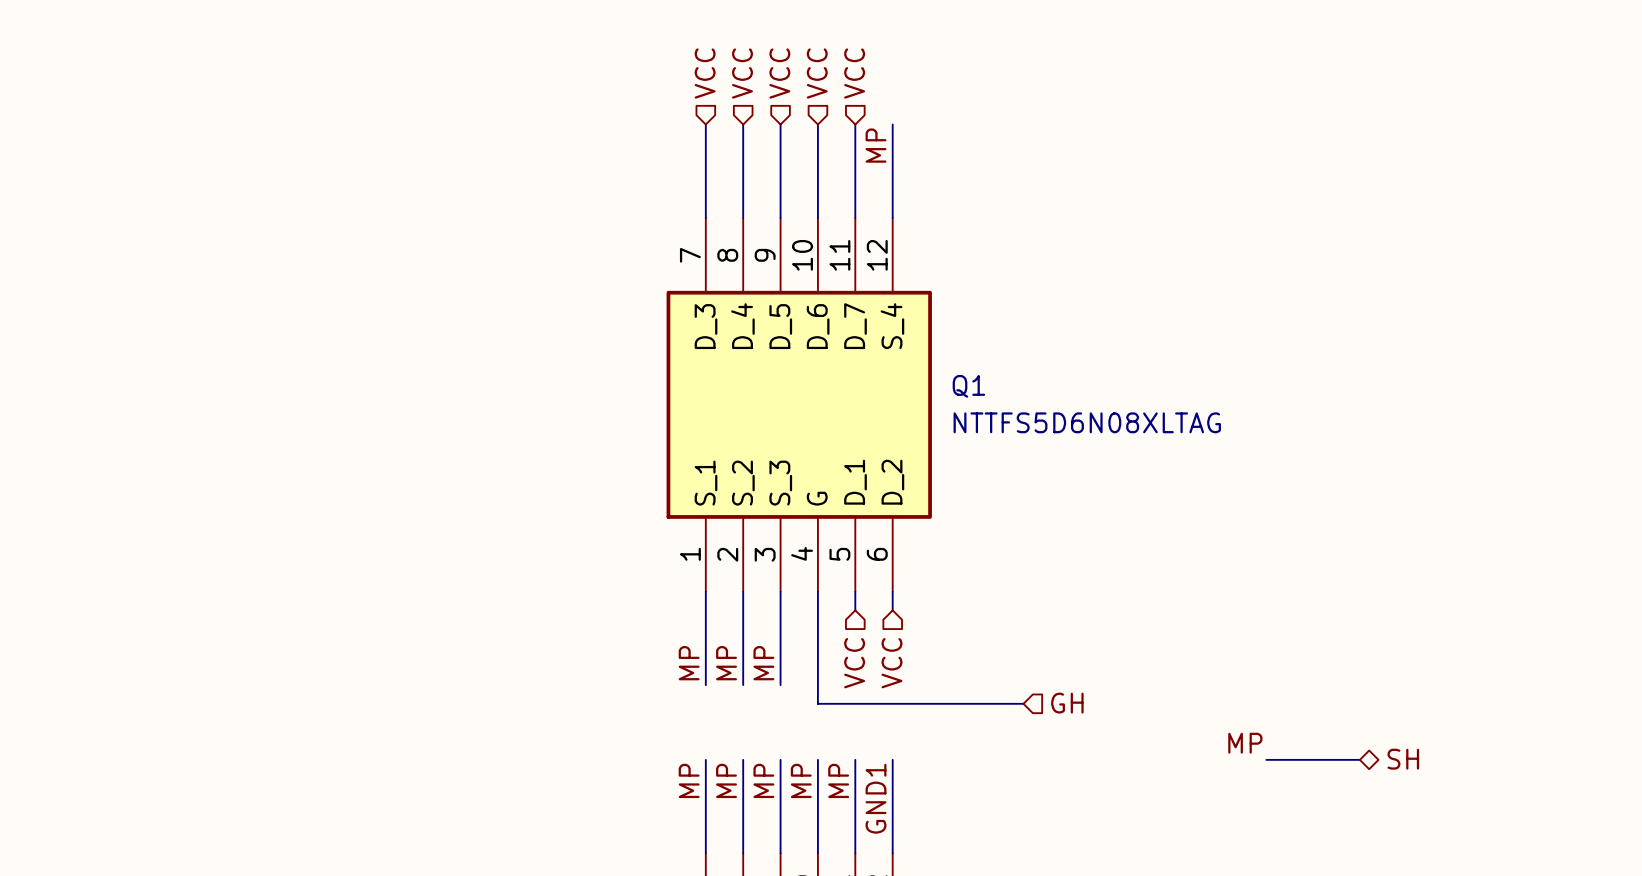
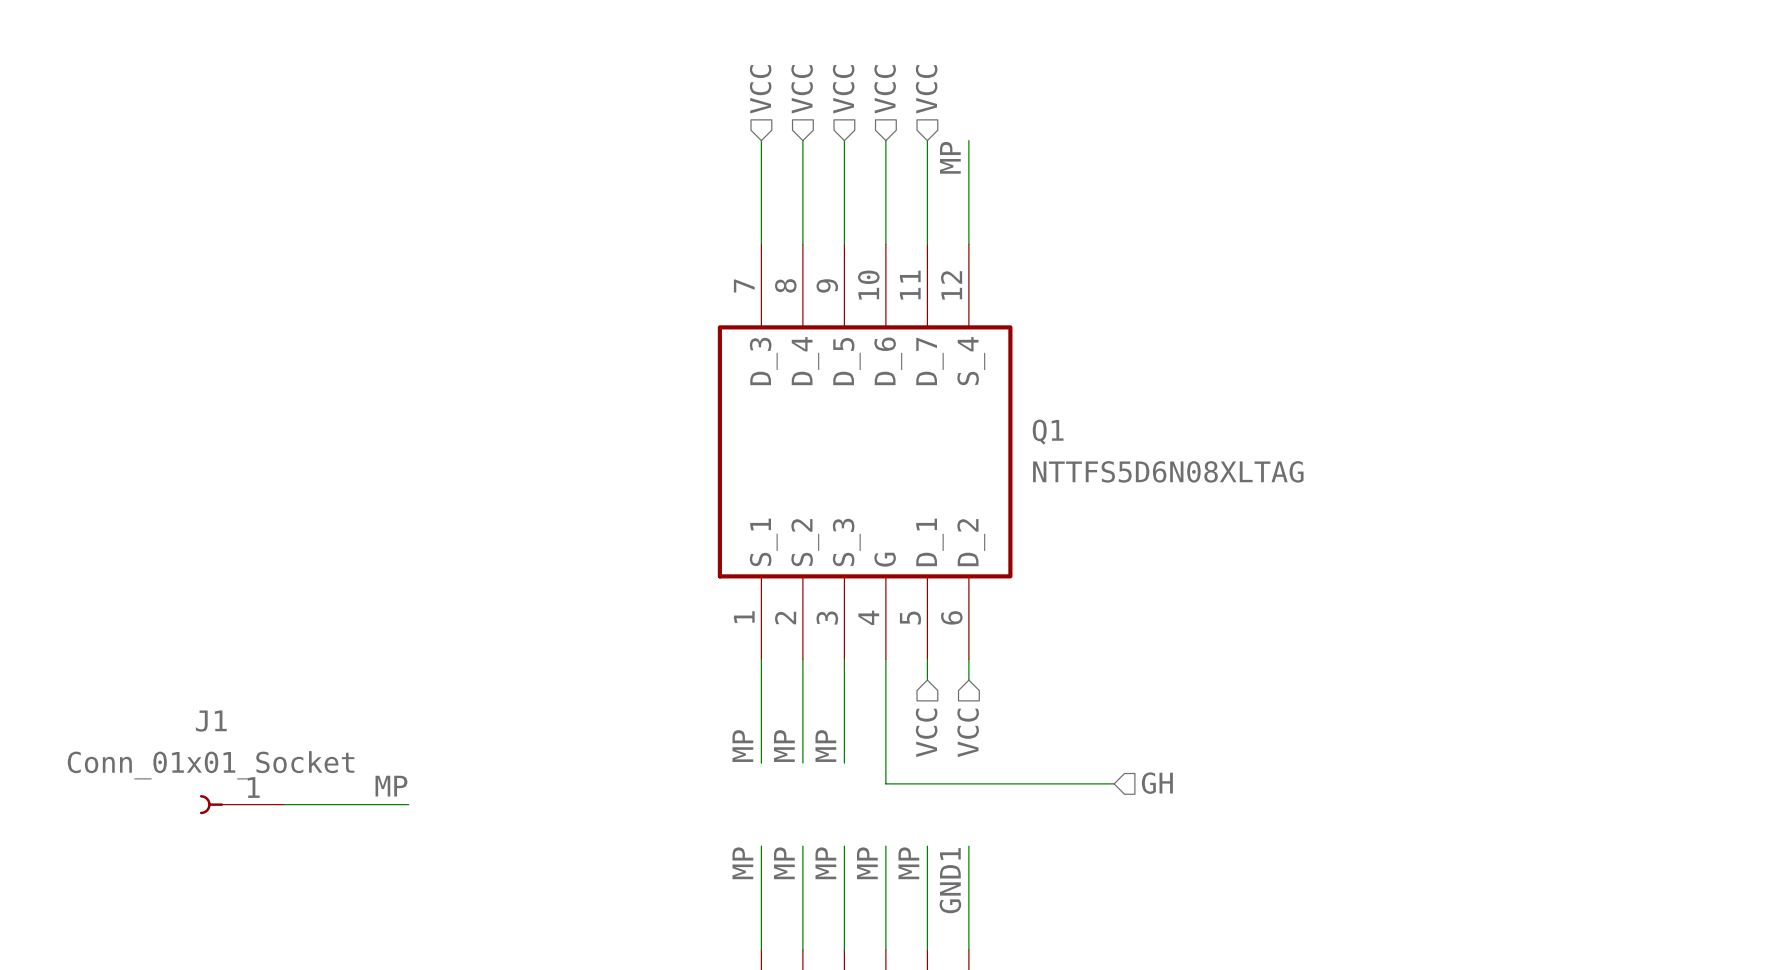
label: none -> MP (391, 786)
J1: none -> Conn_01x01_Socket (242, 804)
wire: none -> (284, 804) (408, 804)
label: MP (1245, 743) -> none
wire: (1266, 759) (1359, 759) -> none
hierarchical label: SH (1403, 759) -> none

